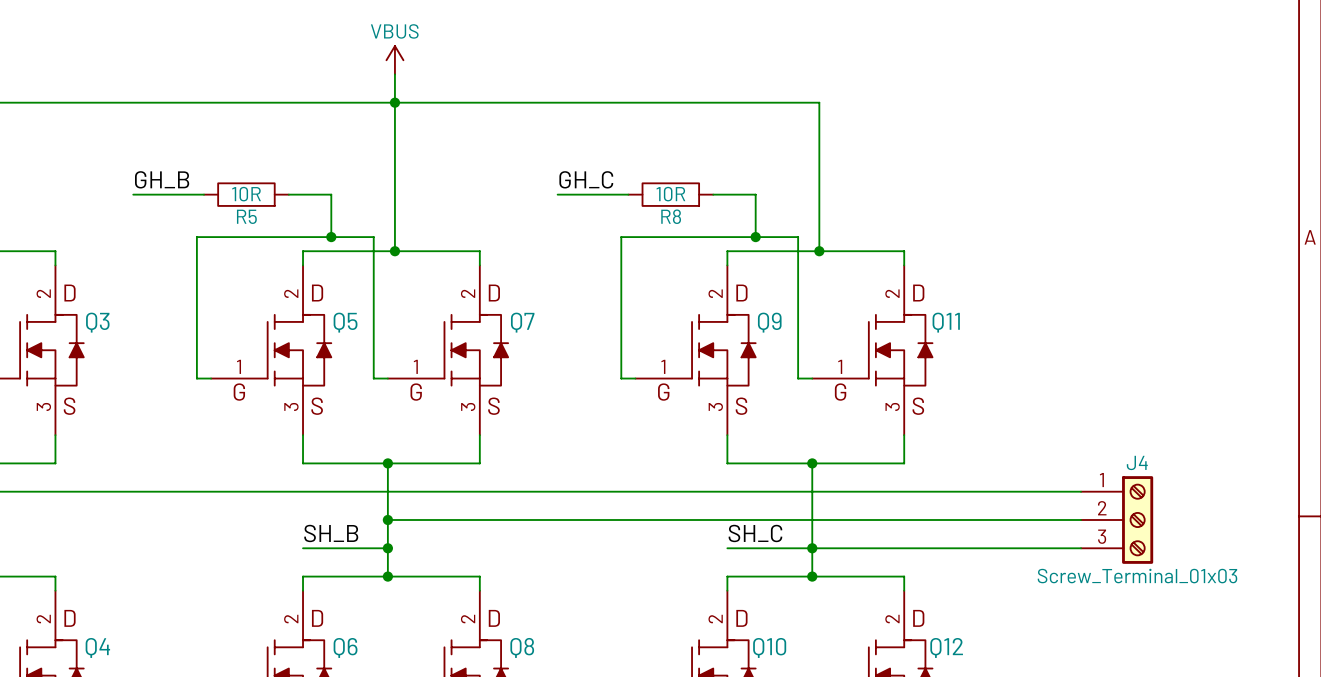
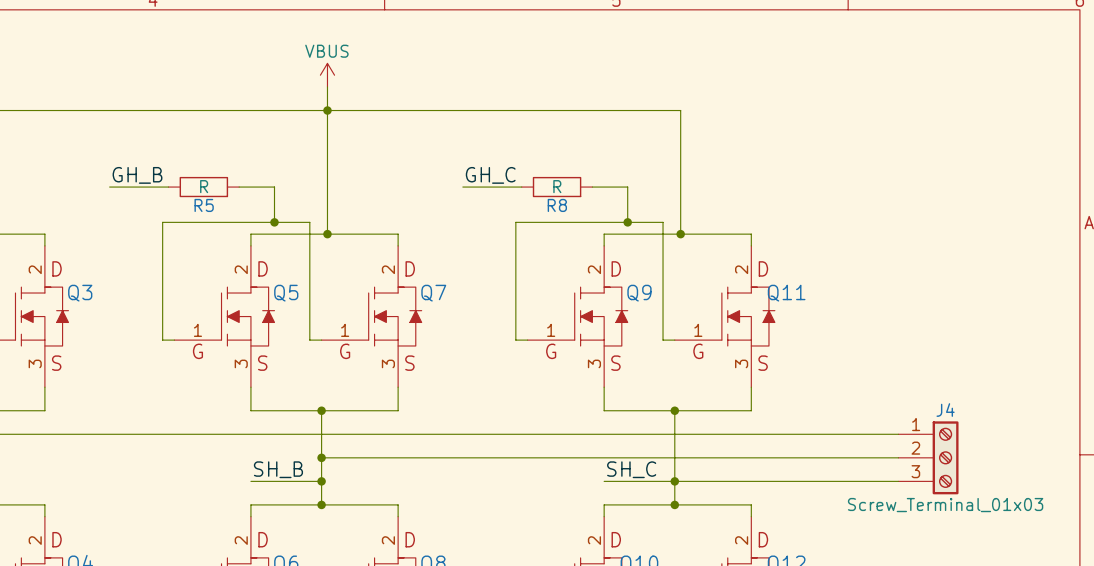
R5 value: 10R (246, 194) -> R (204, 186)
R8 value: 10R (670, 194) -> R (557, 186)

